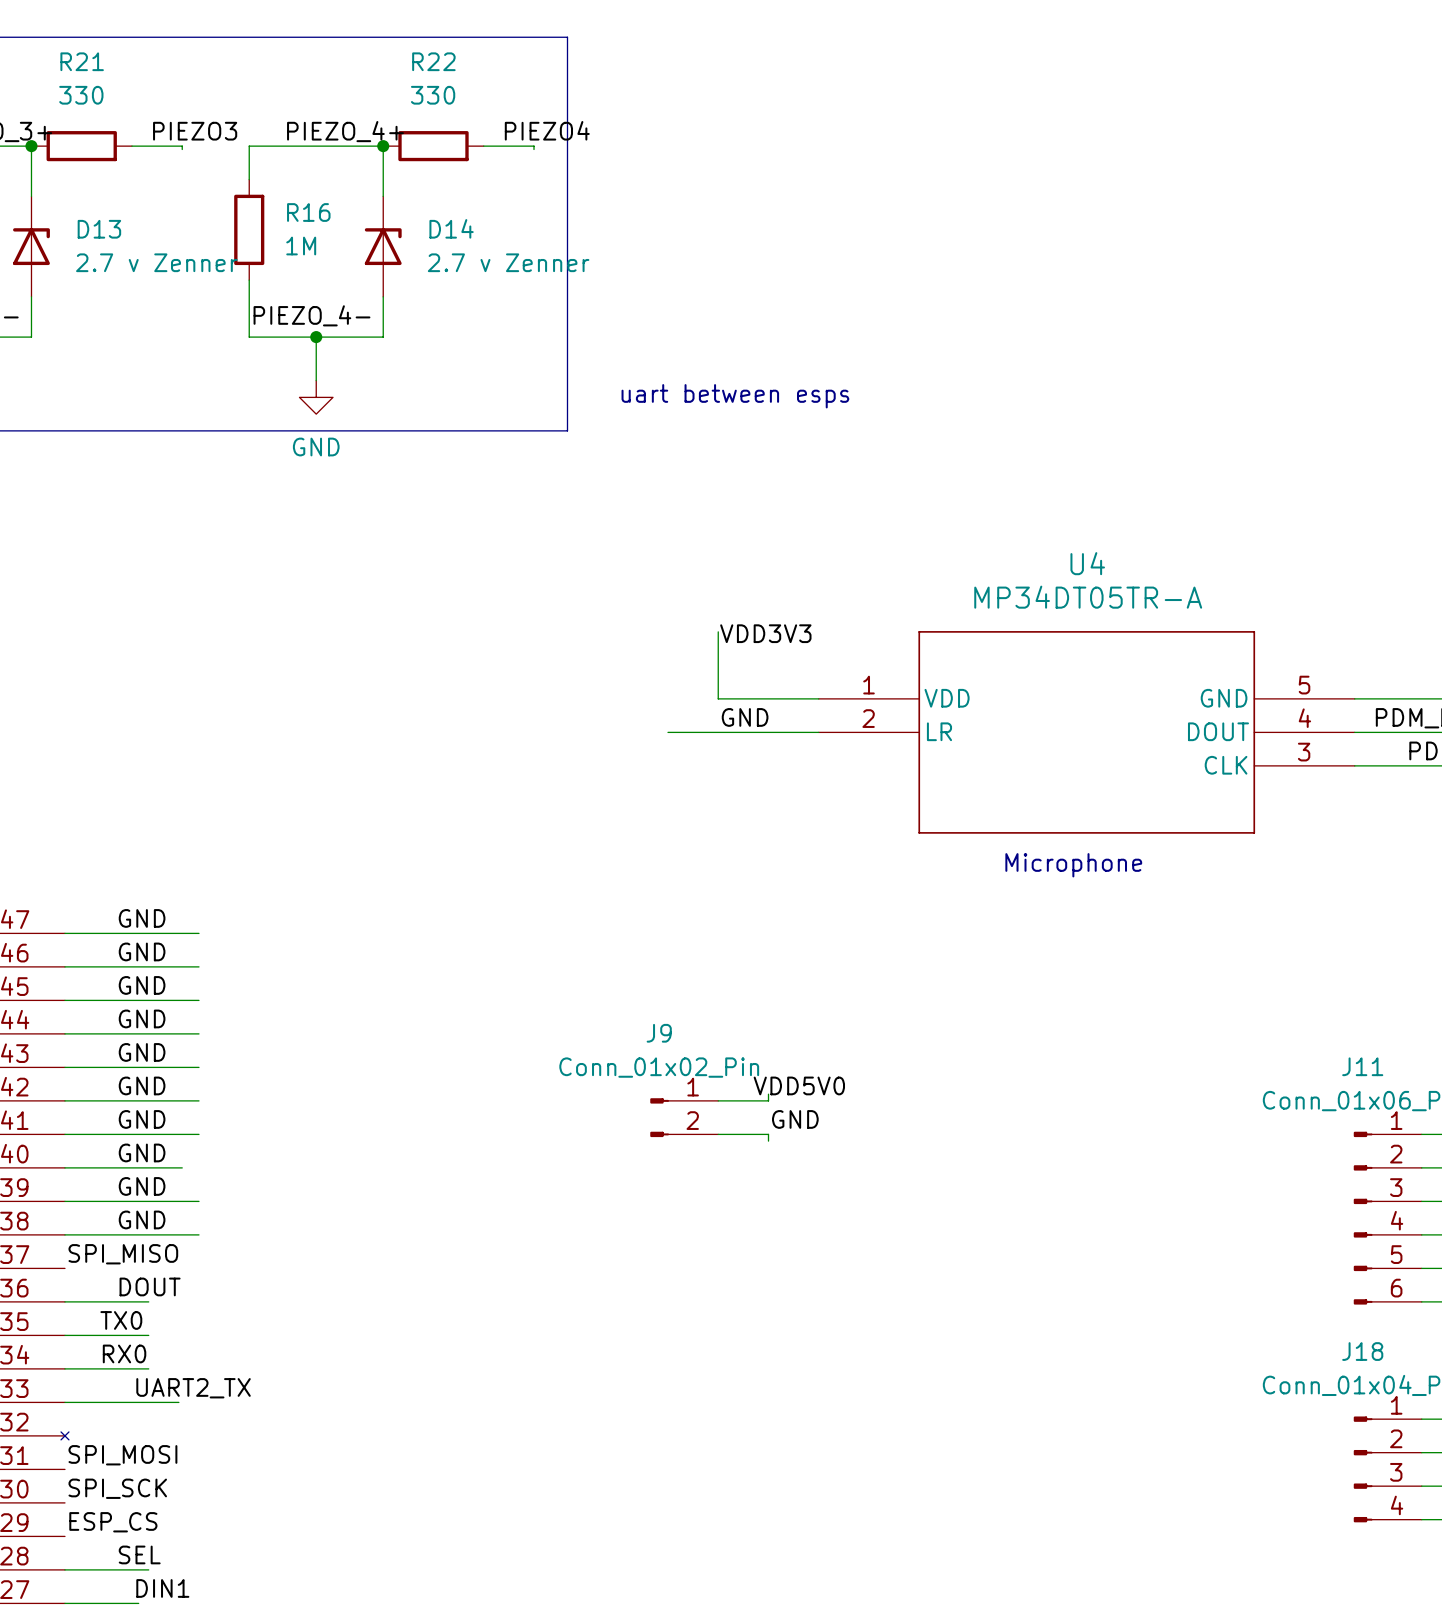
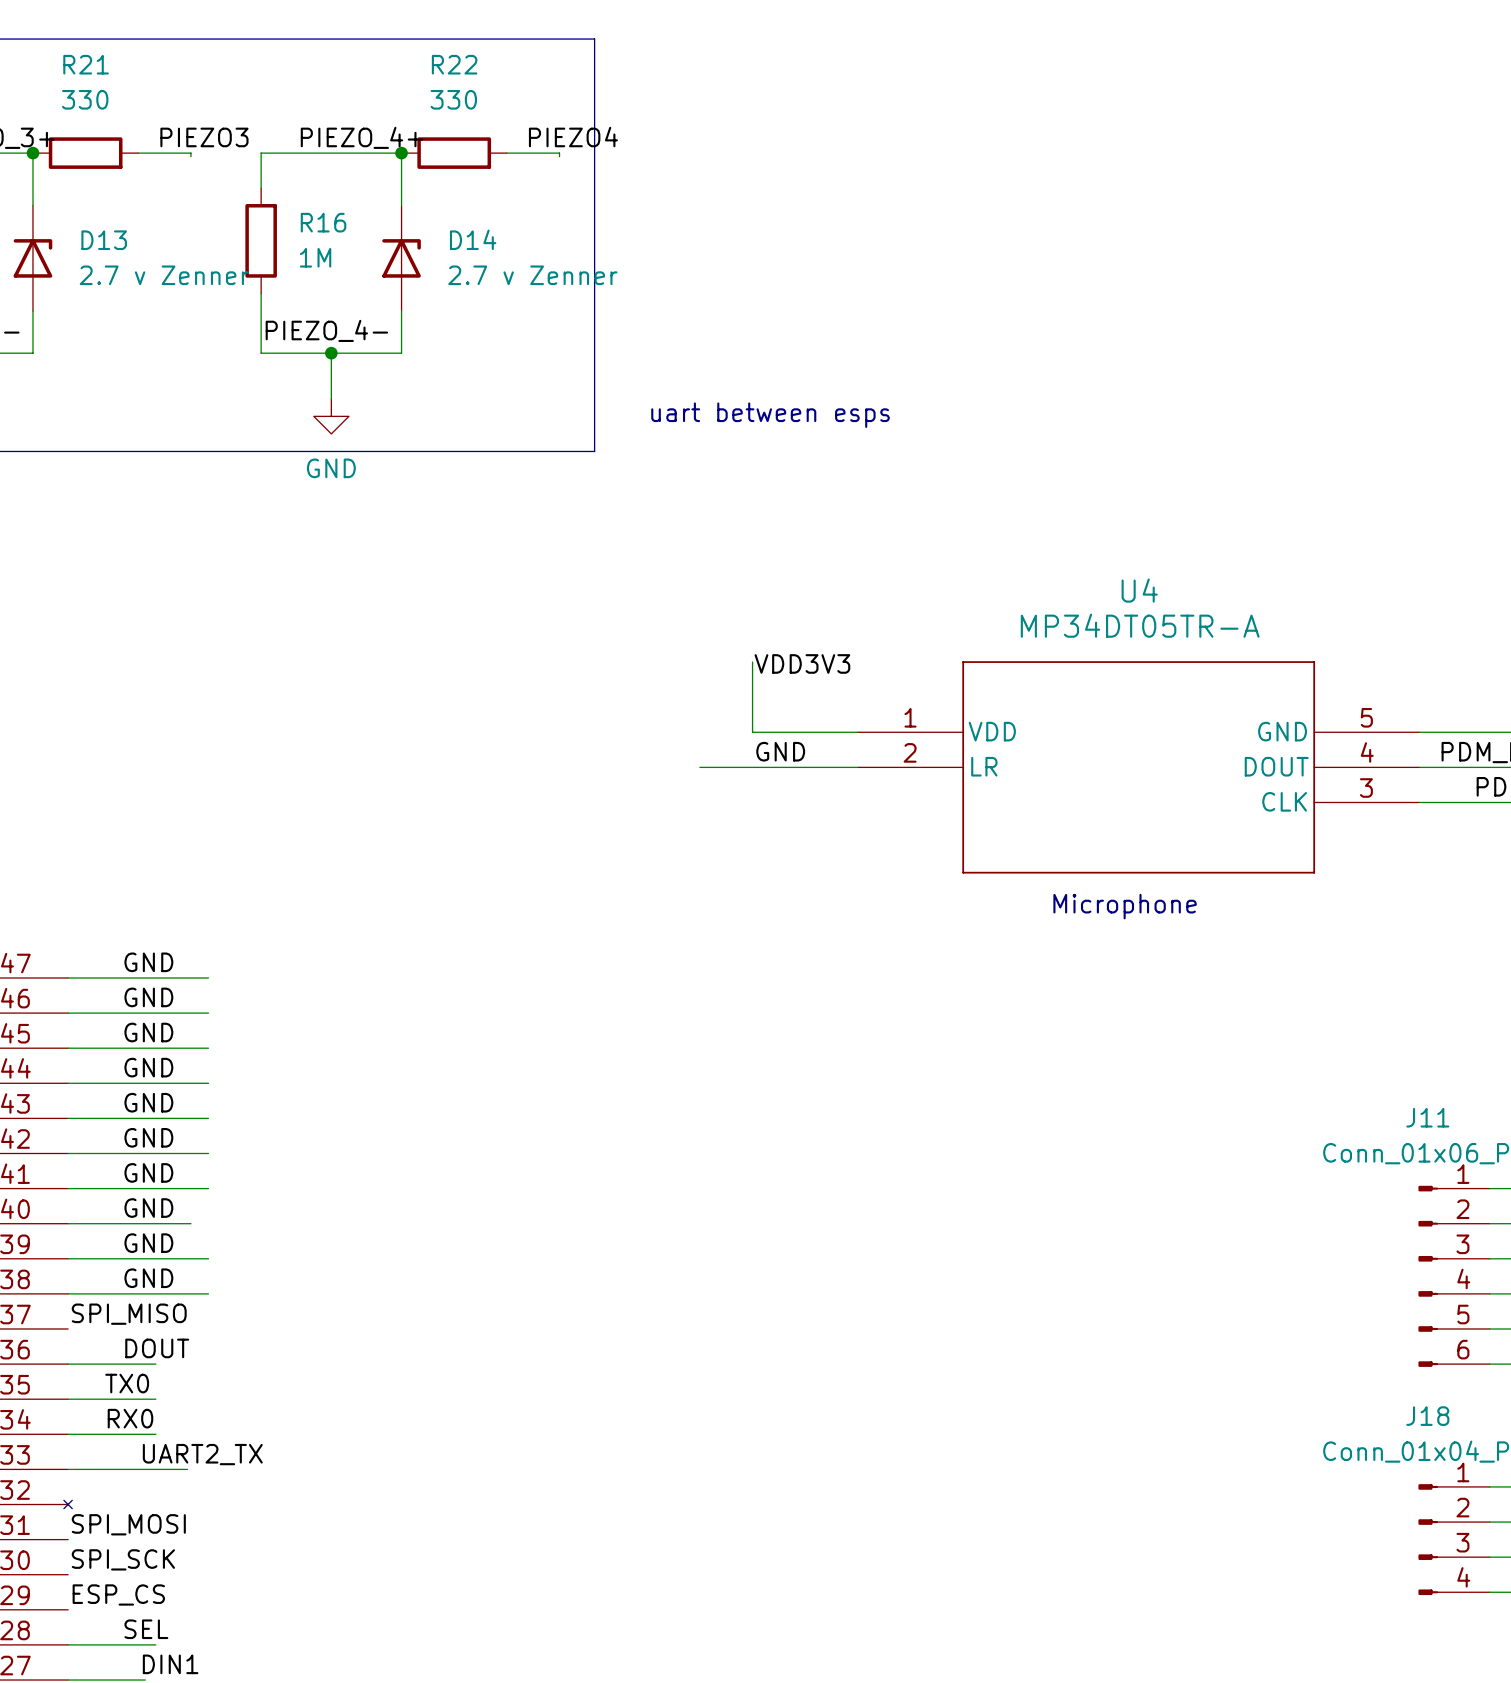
label: VDD5V0 (799, 1085) -> none
wire: (768, 1094) (768, 1100) (718, 1100) -> none
J9: Conn_01x02_Pin (684, 1117) -> none
label: GND (795, 1119) -> none
wire: (718, 1134) (768, 1134) (768, 1141) -> none

